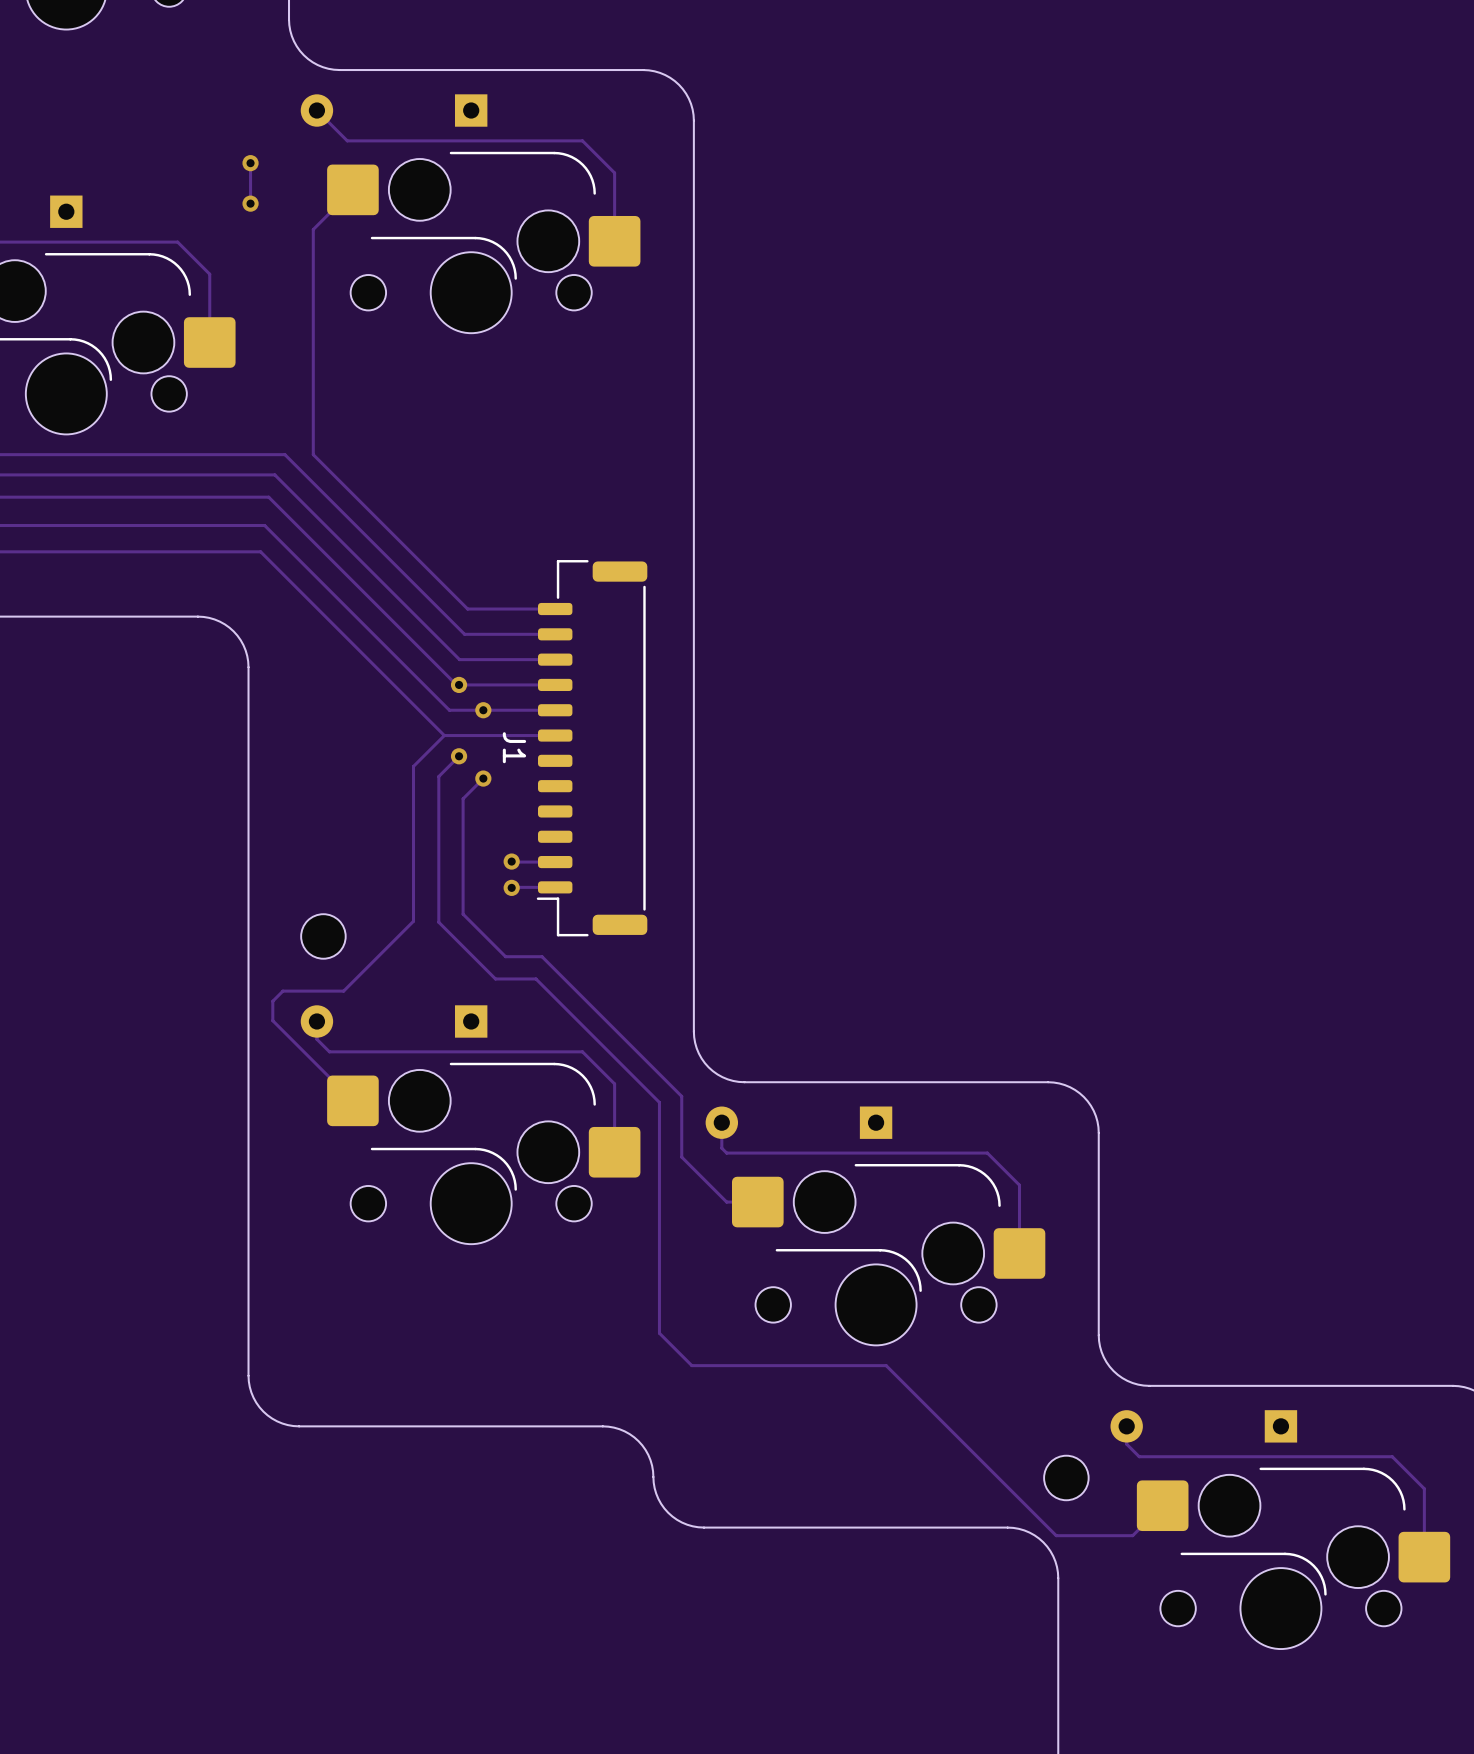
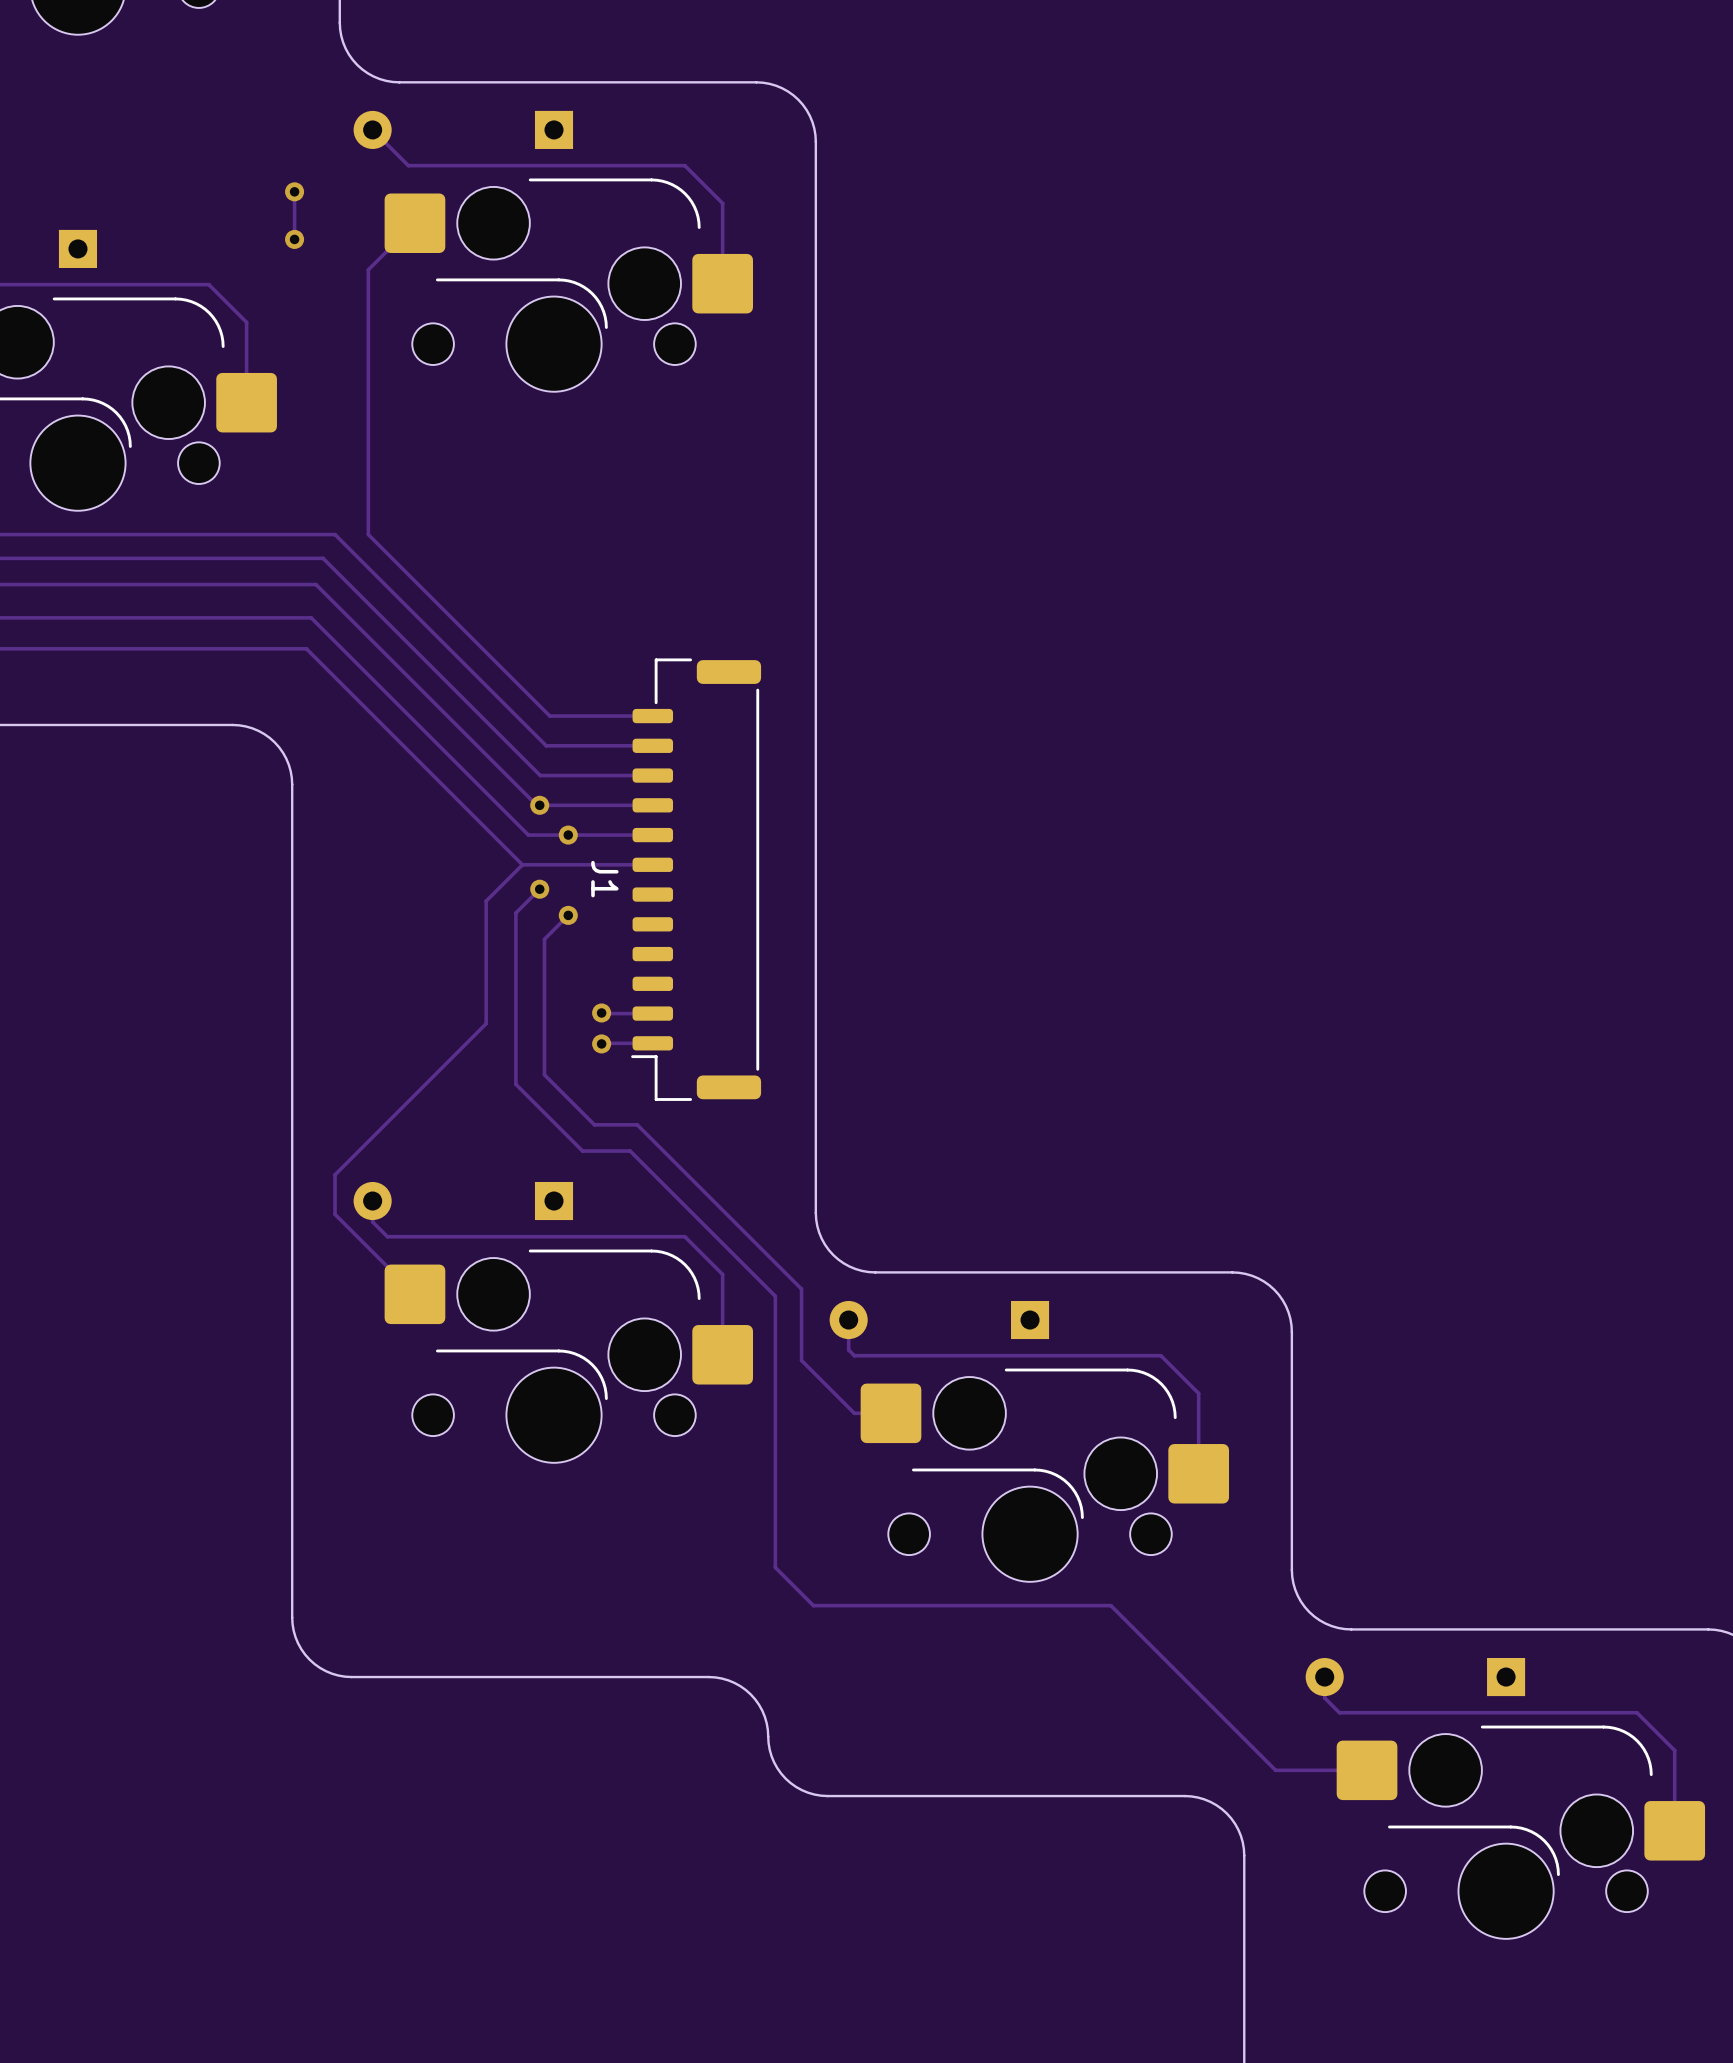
track: (413, 870) (413, 921) (343, 991) (282, 991) (272, 1001) (272, 1020) (284, 1032) -> (486, 1023) (335, 1174) (335, 1214)
part: (323, 936) -> none
track: (886, 1365) (1056, 1535) (1132, 1535) (1162, 1505) -> (1041, 1605) (1110, 1605) (1275, 1770) (1367, 1770)
part: (1066, 1477) -> none

